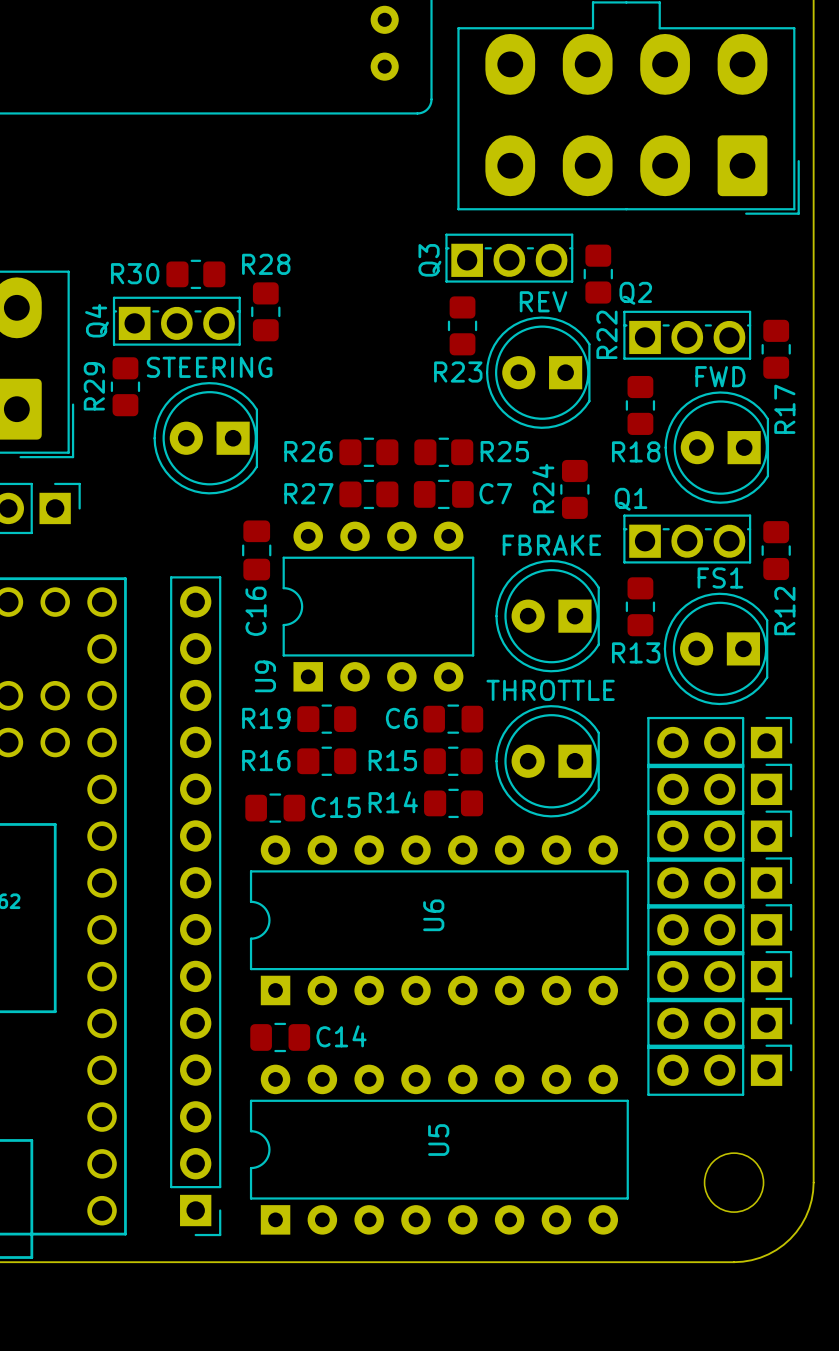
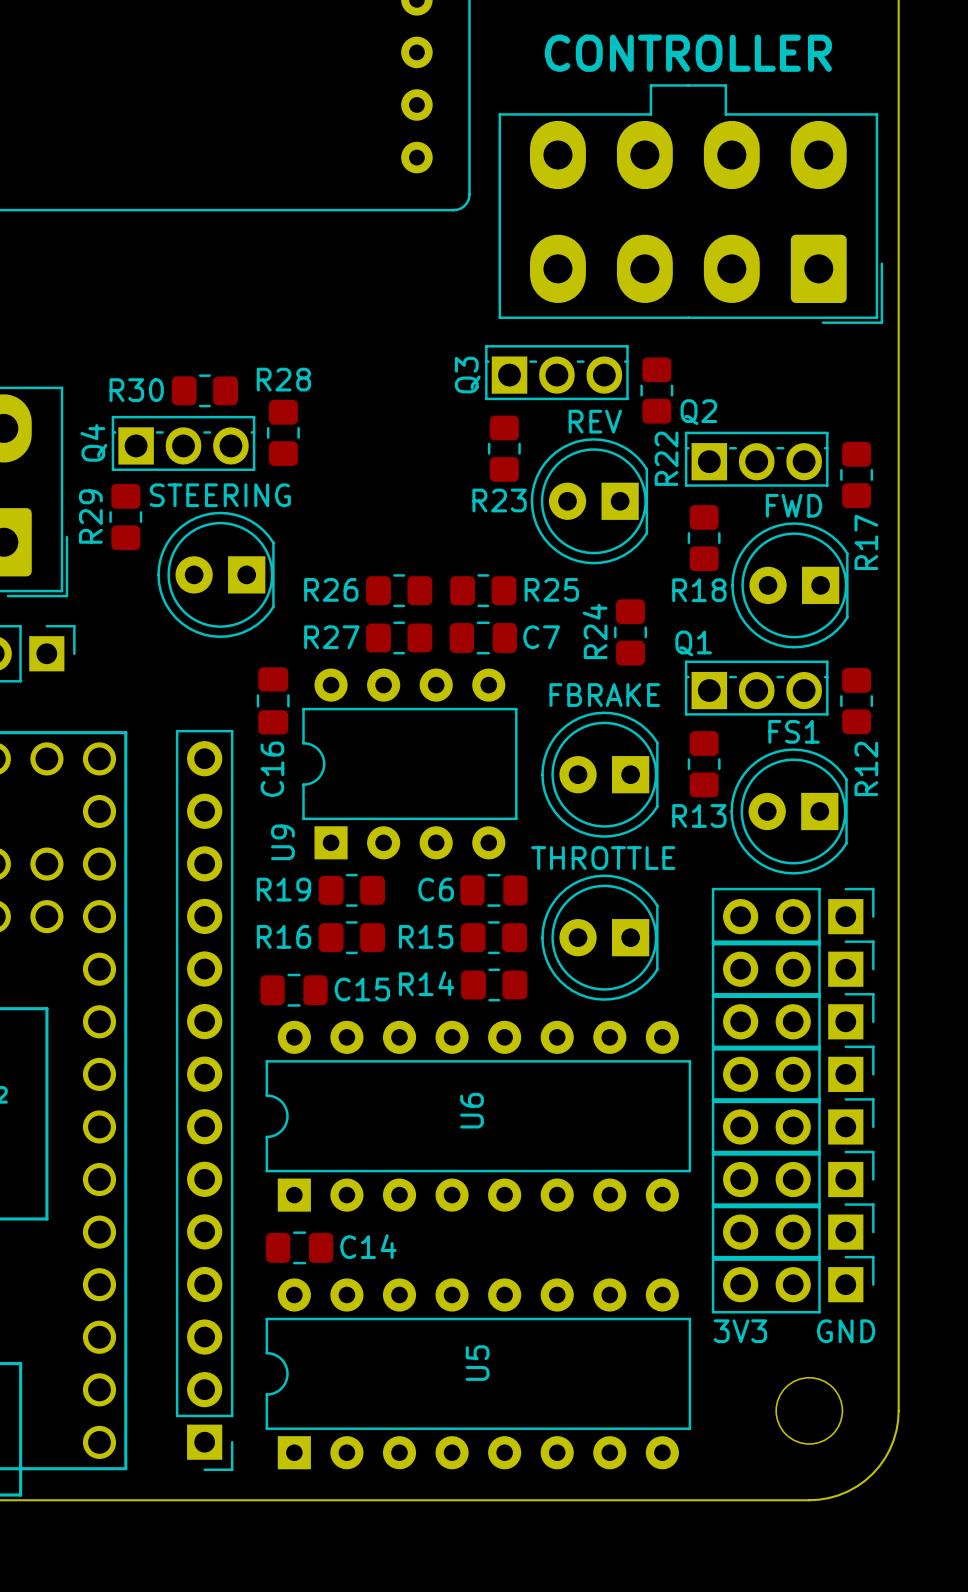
text: none -> 3V3 (740, 1331)
text: none -> GND (846, 1331)

